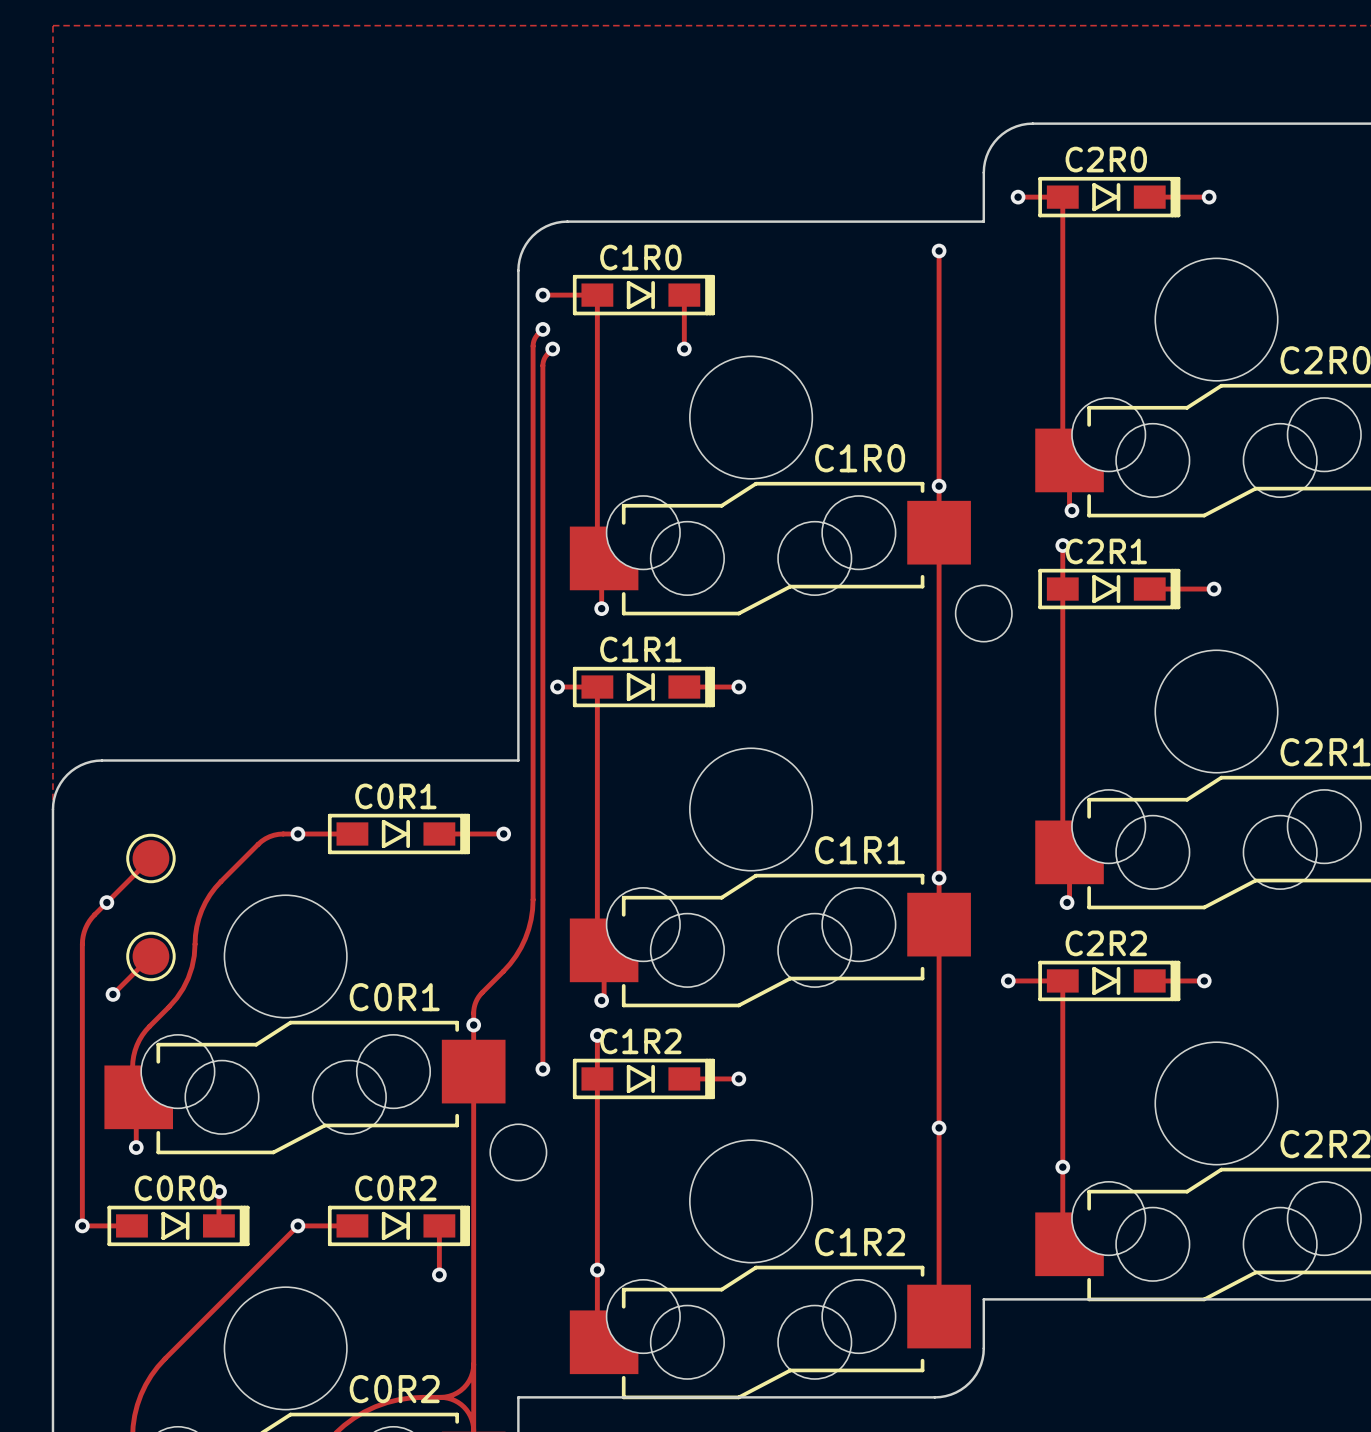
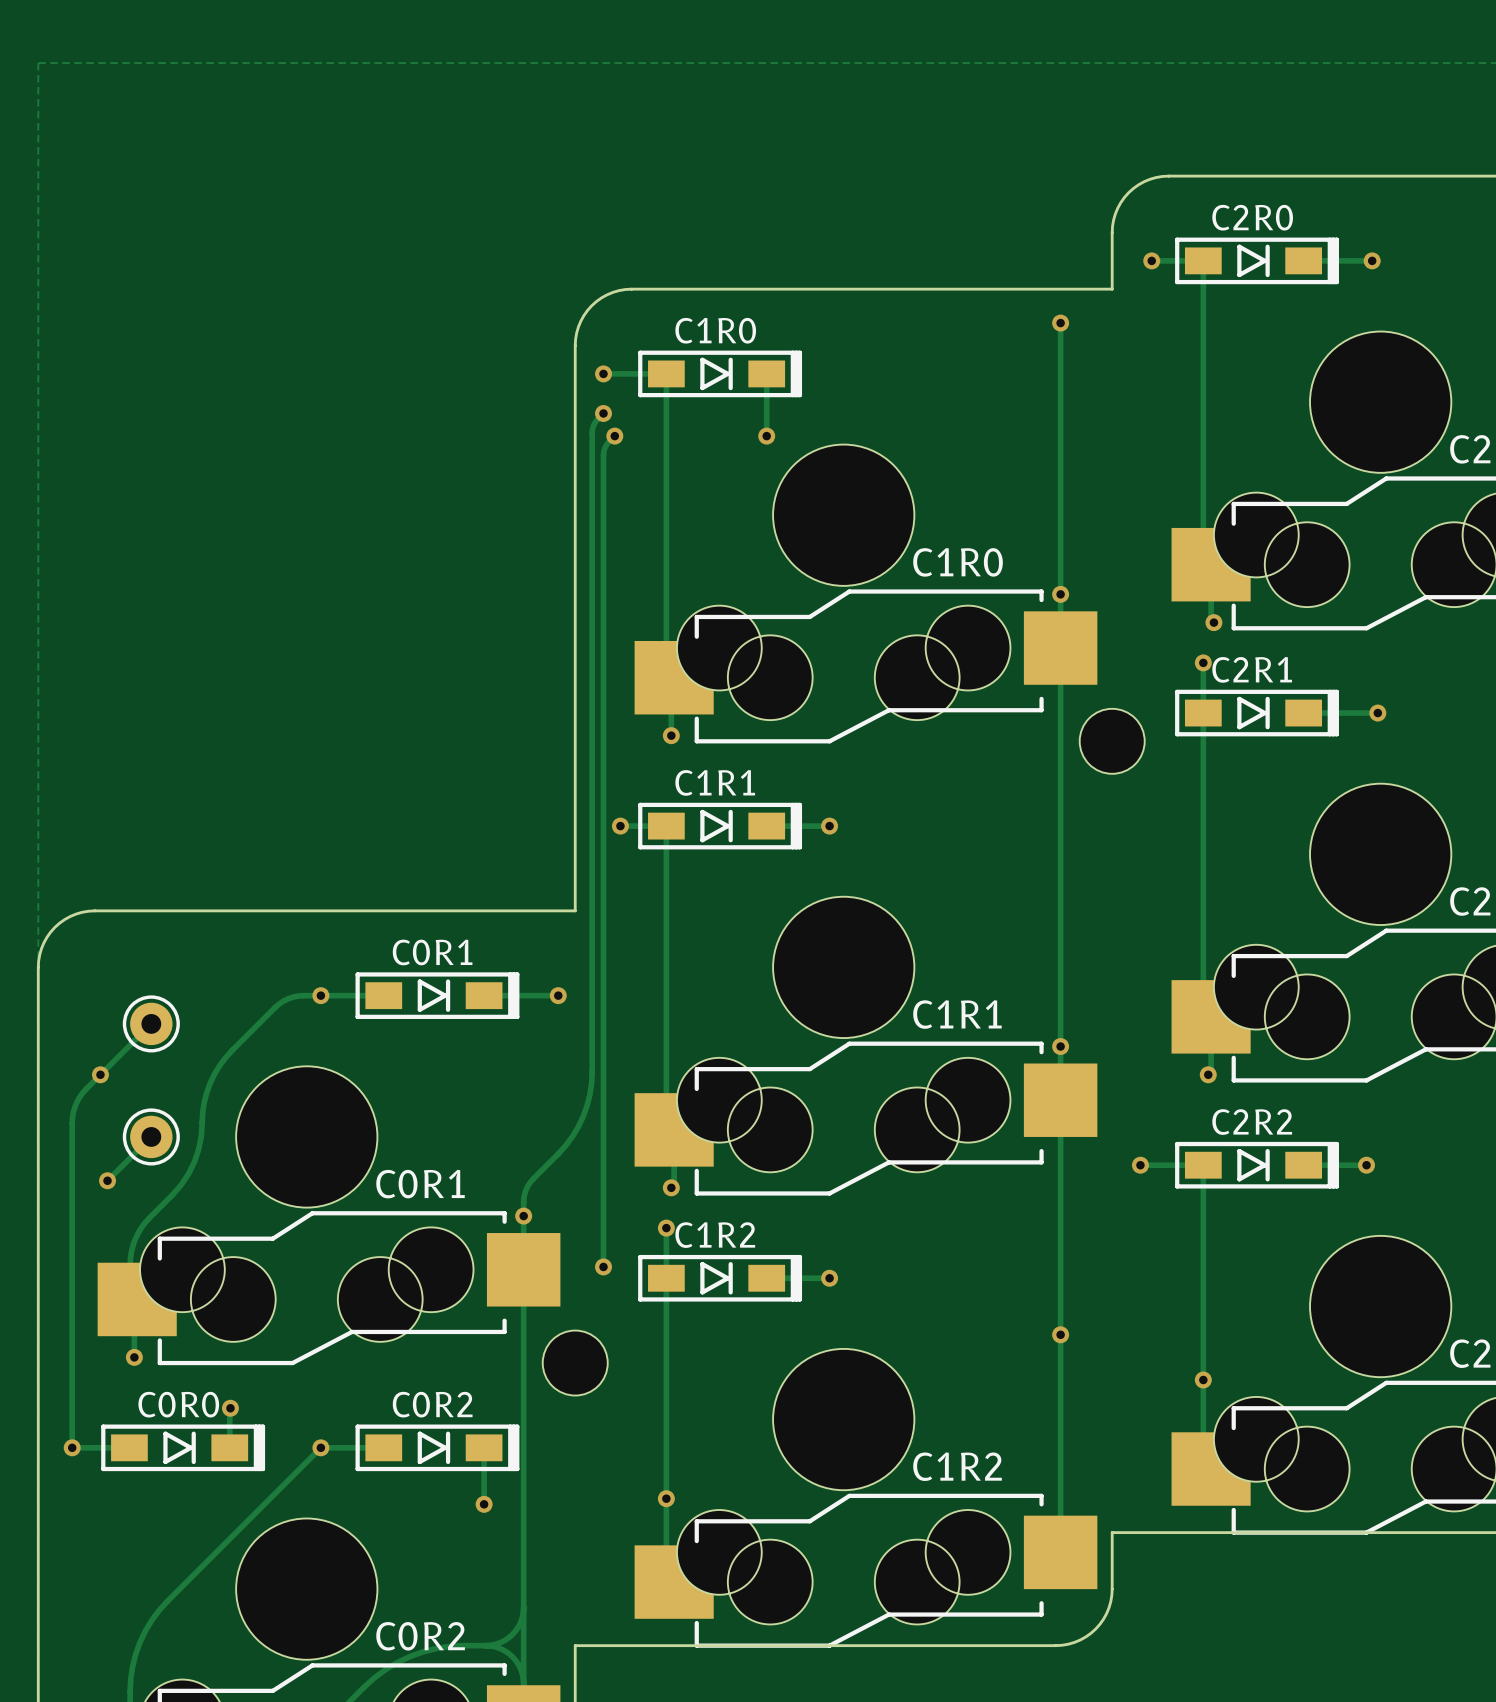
part footprint: [126, 833, 176, 884] -> [122, 995, 180, 1053]
part footprint: [126, 931, 176, 982] -> [122, 1108, 180, 1166]

